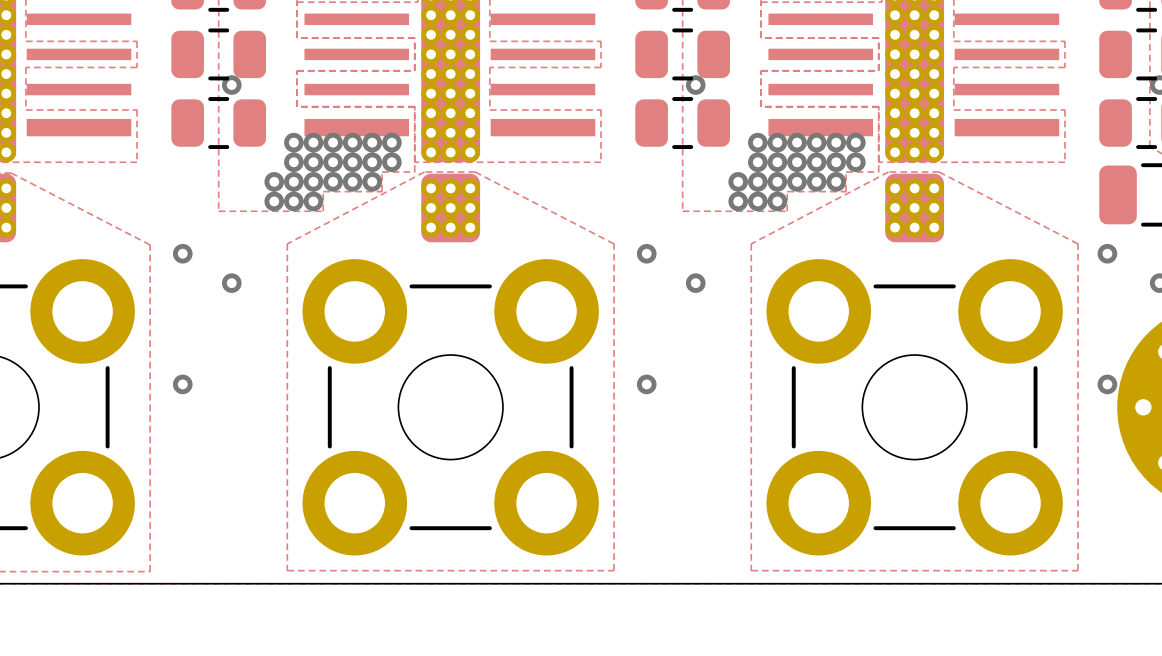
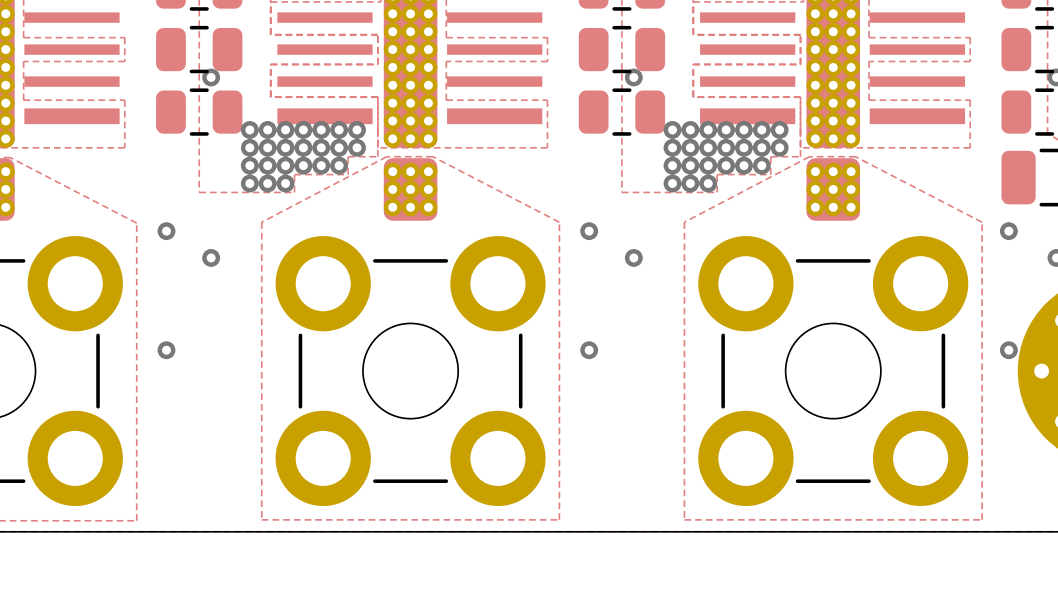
via: none -> (249, 129)
via: none -> (672, 129)
via: none -> (249, 147)
via: none -> (672, 147)

